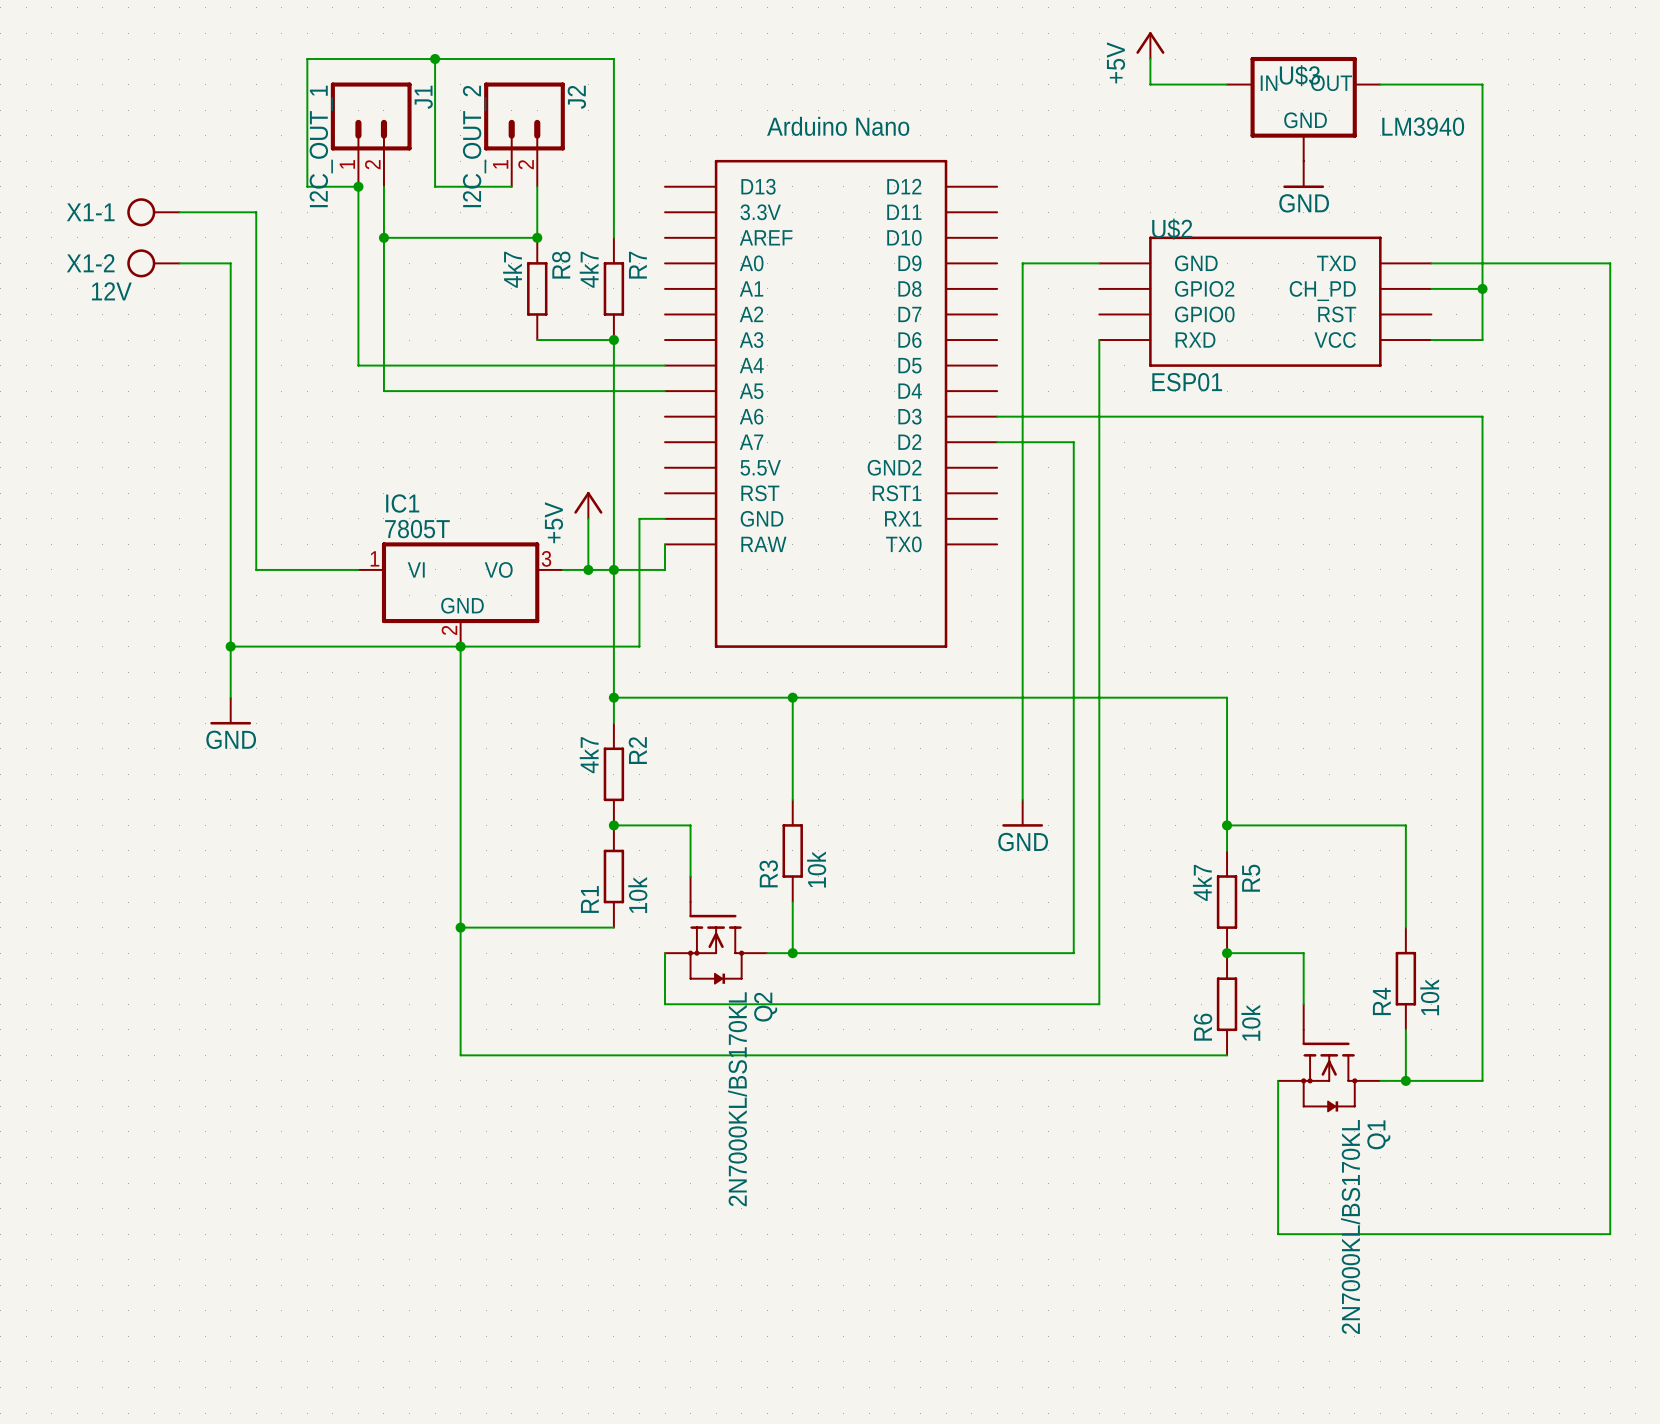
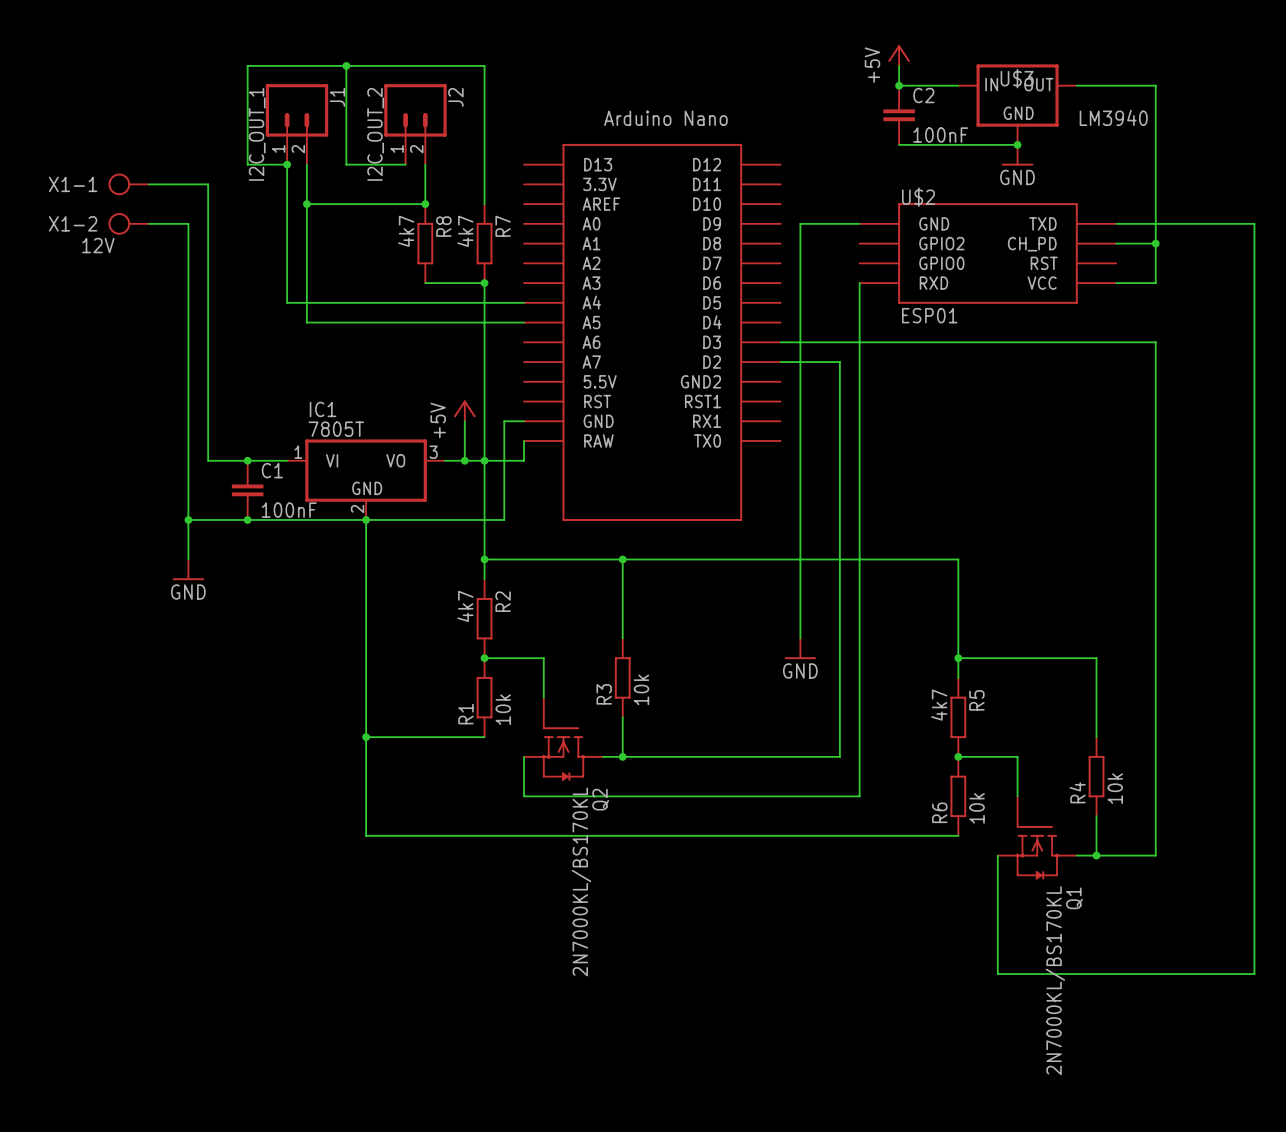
junction: none -> (899, 85)
C2: none -> 100nF (899, 115)
wire: none -> (899, 144) (1017, 144)
junction: none -> (1017, 144)
junction: none -> (247, 460)
C1: none -> 100nF (247, 490)
junction: none -> (247, 519)

